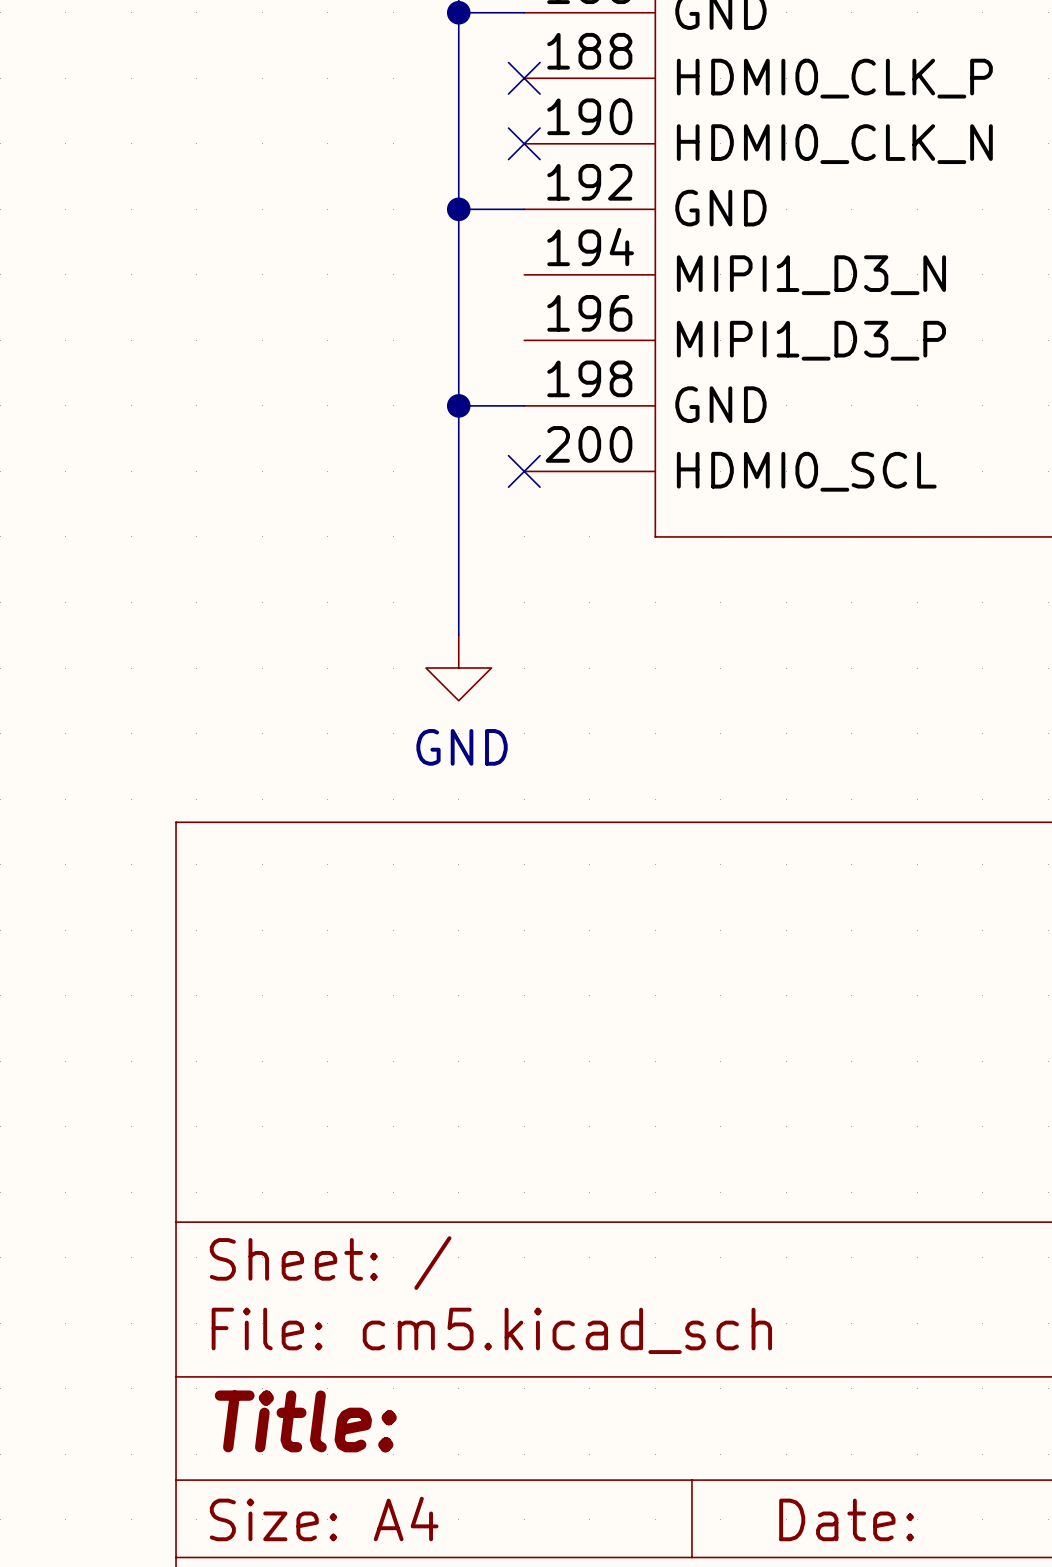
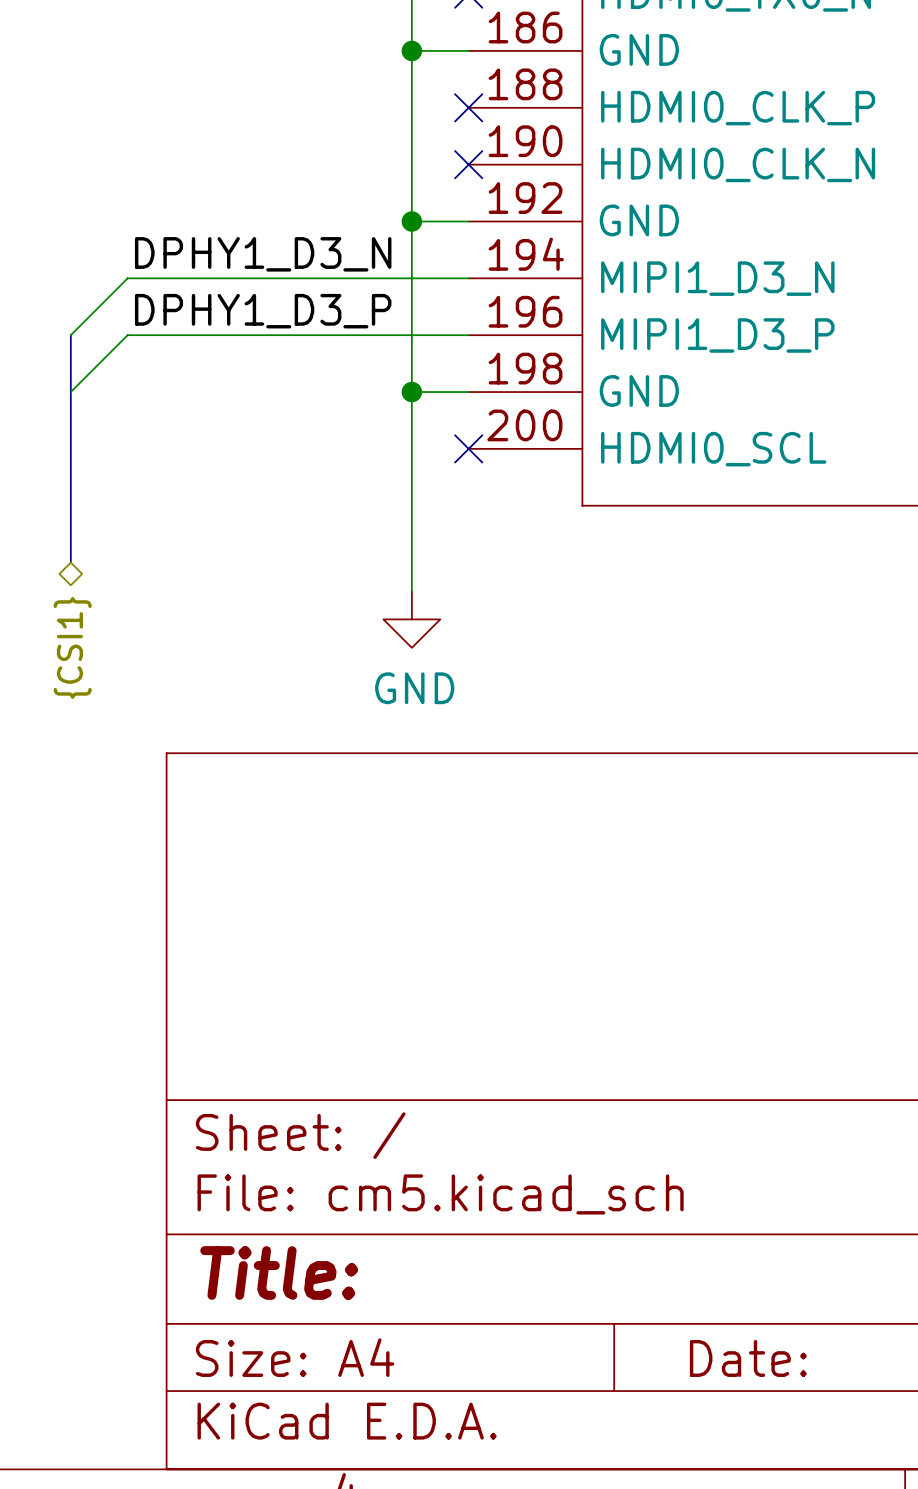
label: none -> DPHY1_D3_N (263, 254)
wire: none -> (468, 278) (127, 278) (70, 335)
label: none -> DPHY1_D3_P (263, 311)
bus: none -> (70, 335) (70, 562)
wire: none -> (468, 335) (127, 335) (70, 392)
hierarchical label: none -> {CSI1} (72, 647)

